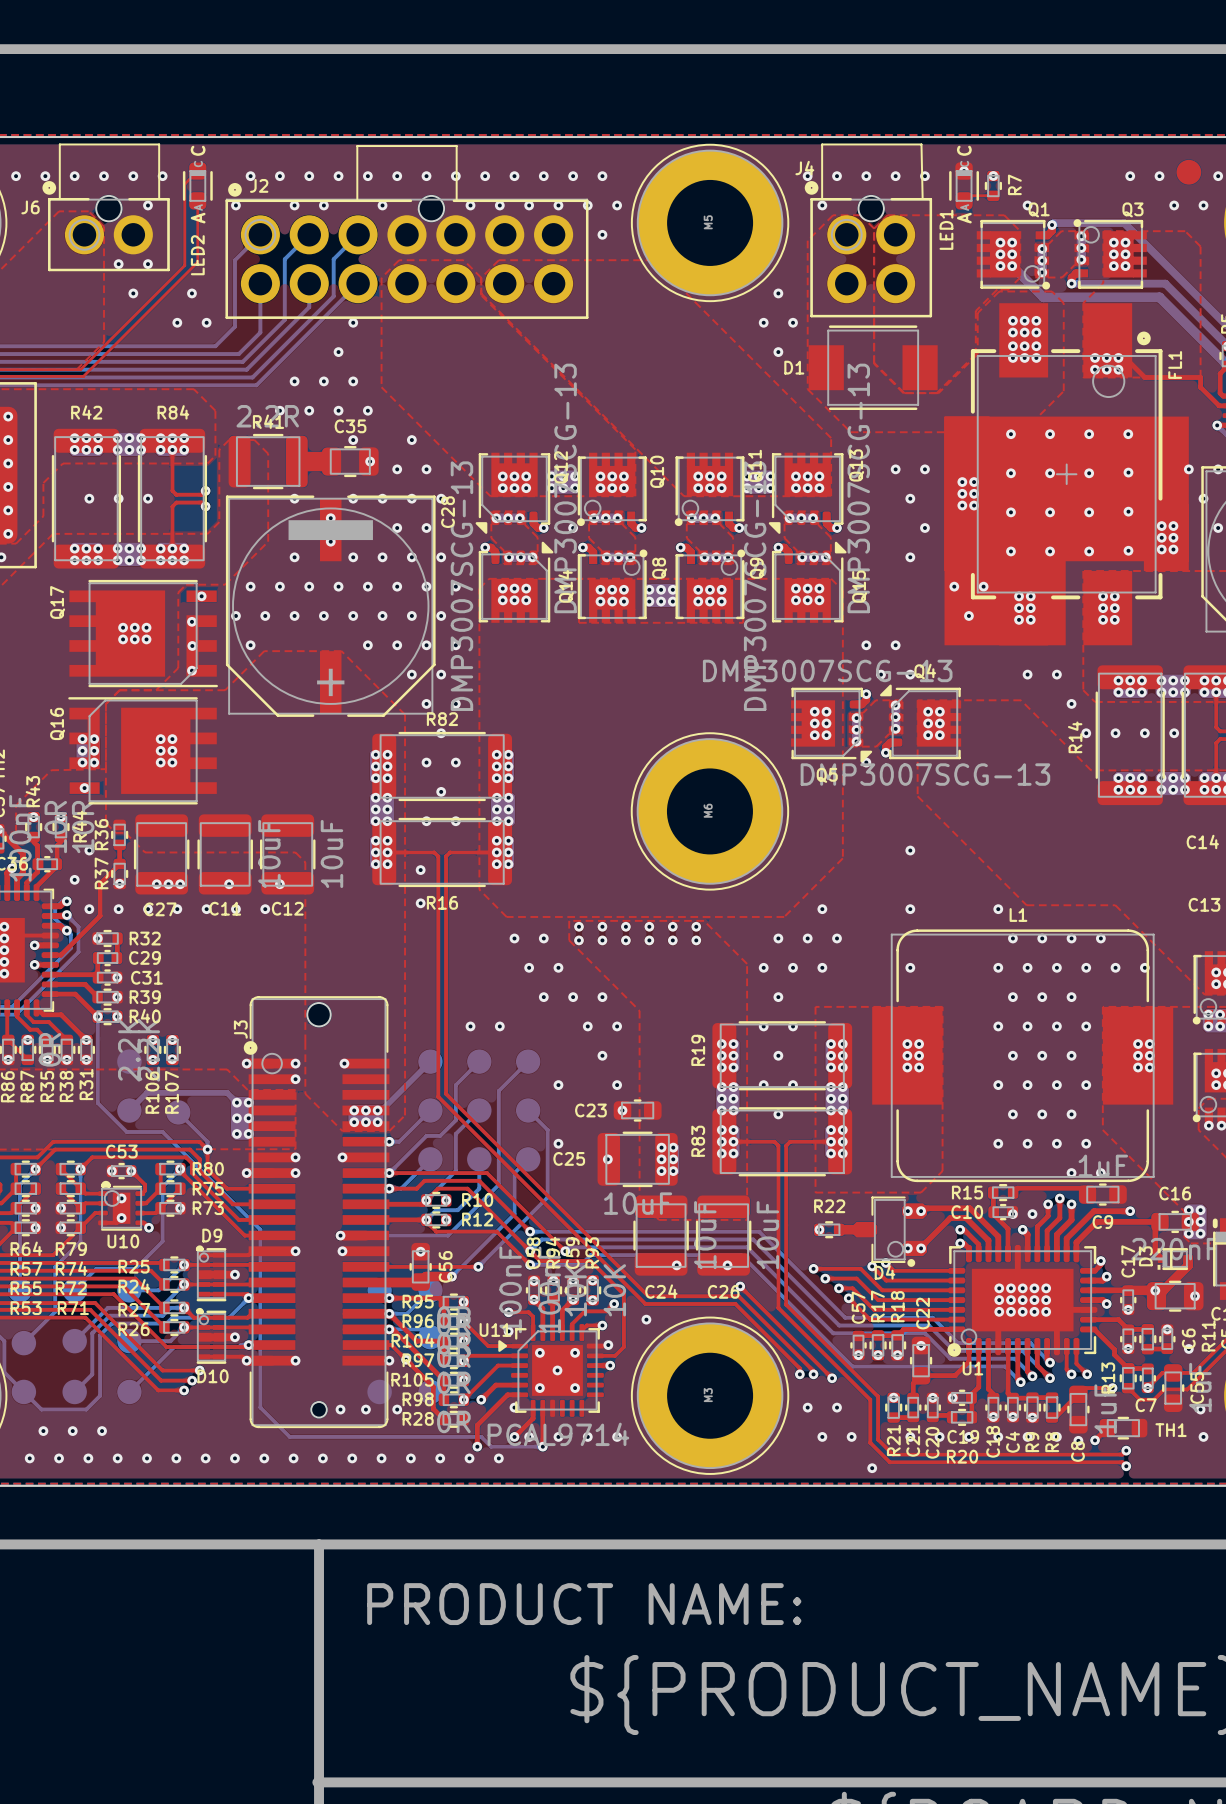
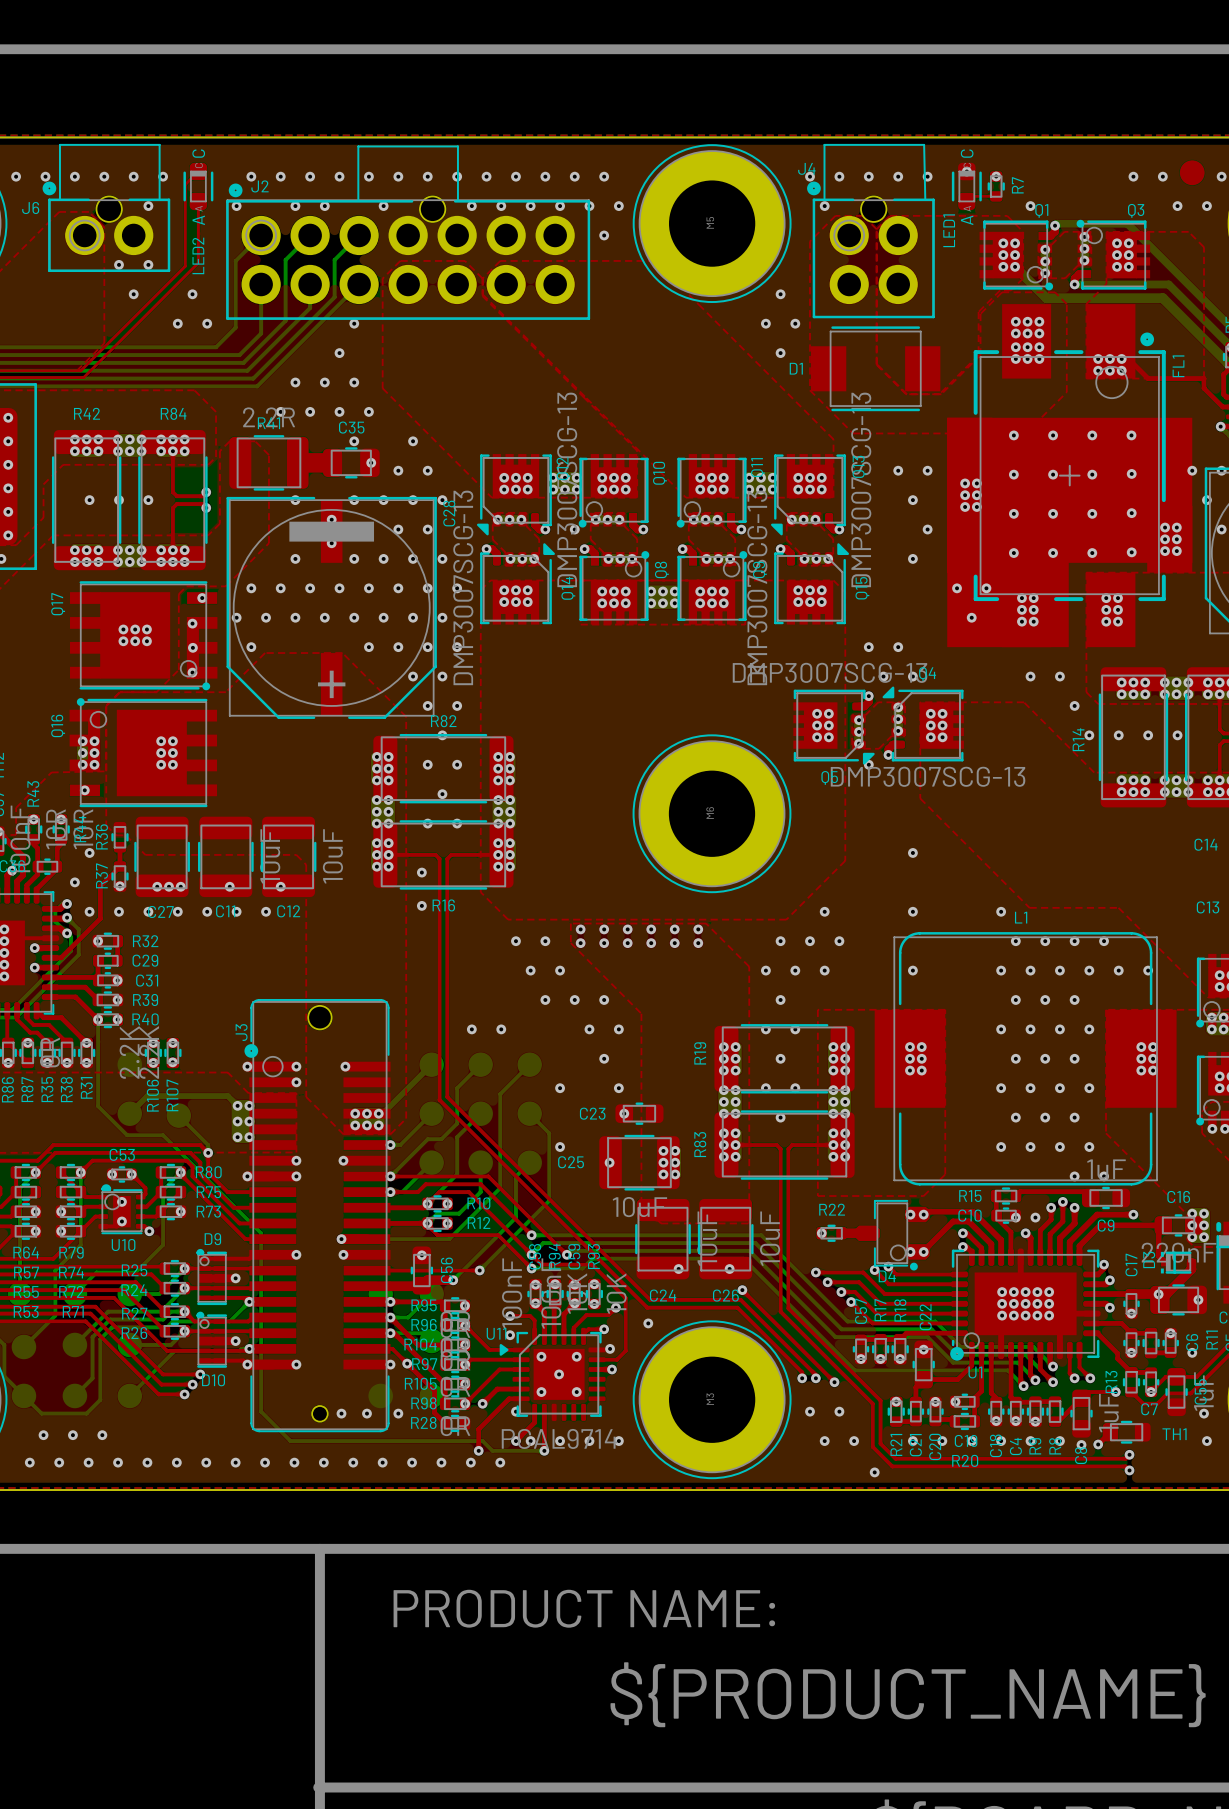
Q17 footprint: [69, 579, 218, 688] -> [70, 581, 218, 691]
Q16 footprint: [68, 697, 217, 805] -> [69, 698, 218, 808]

